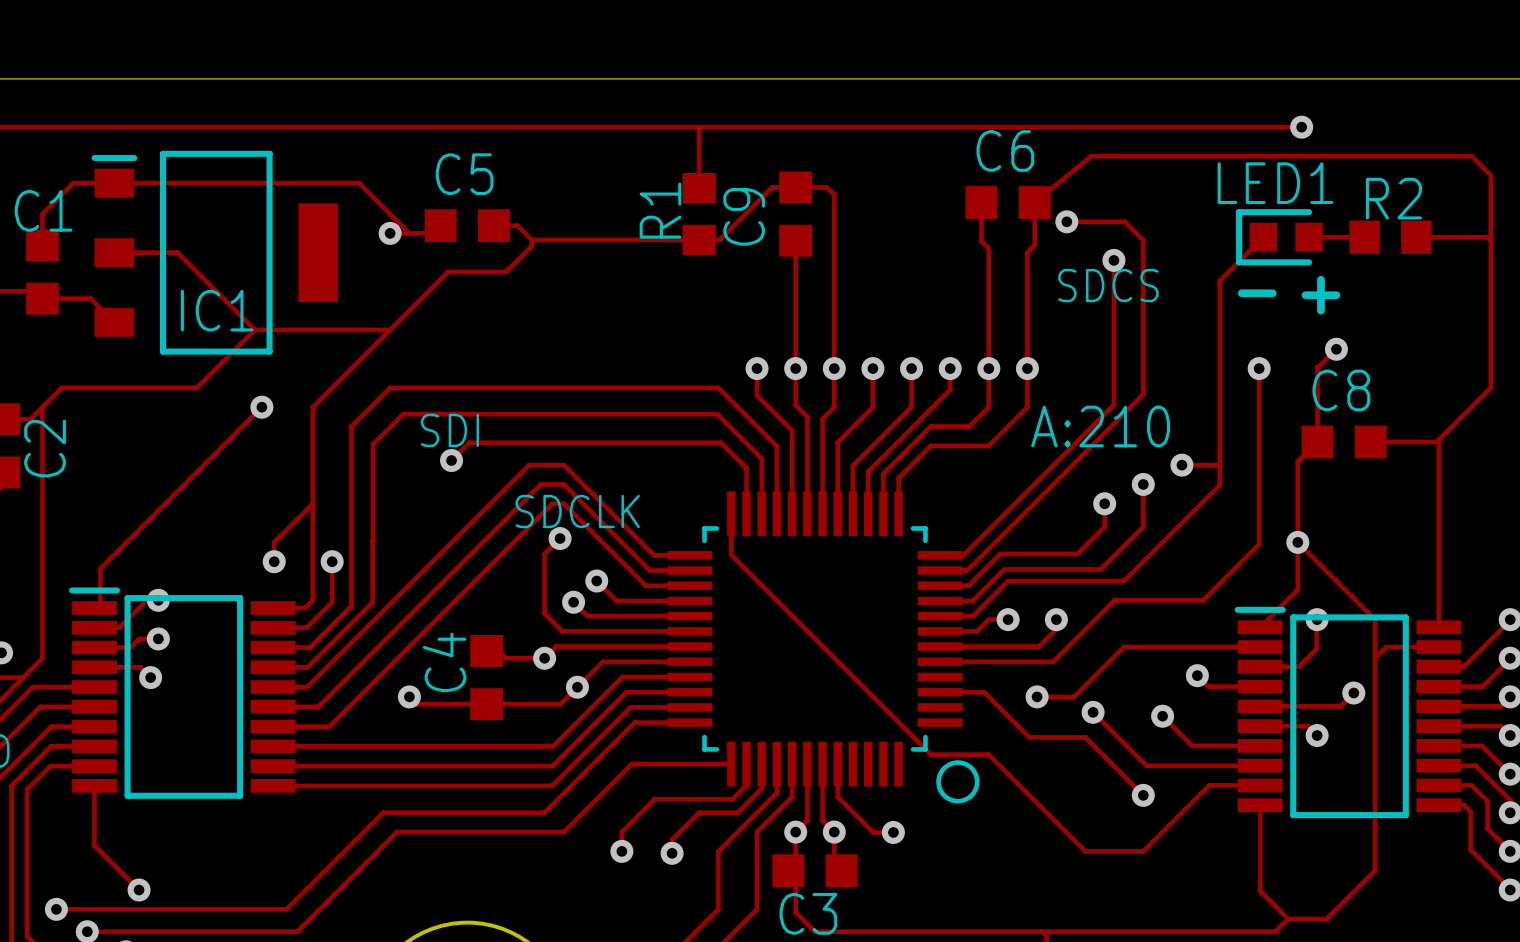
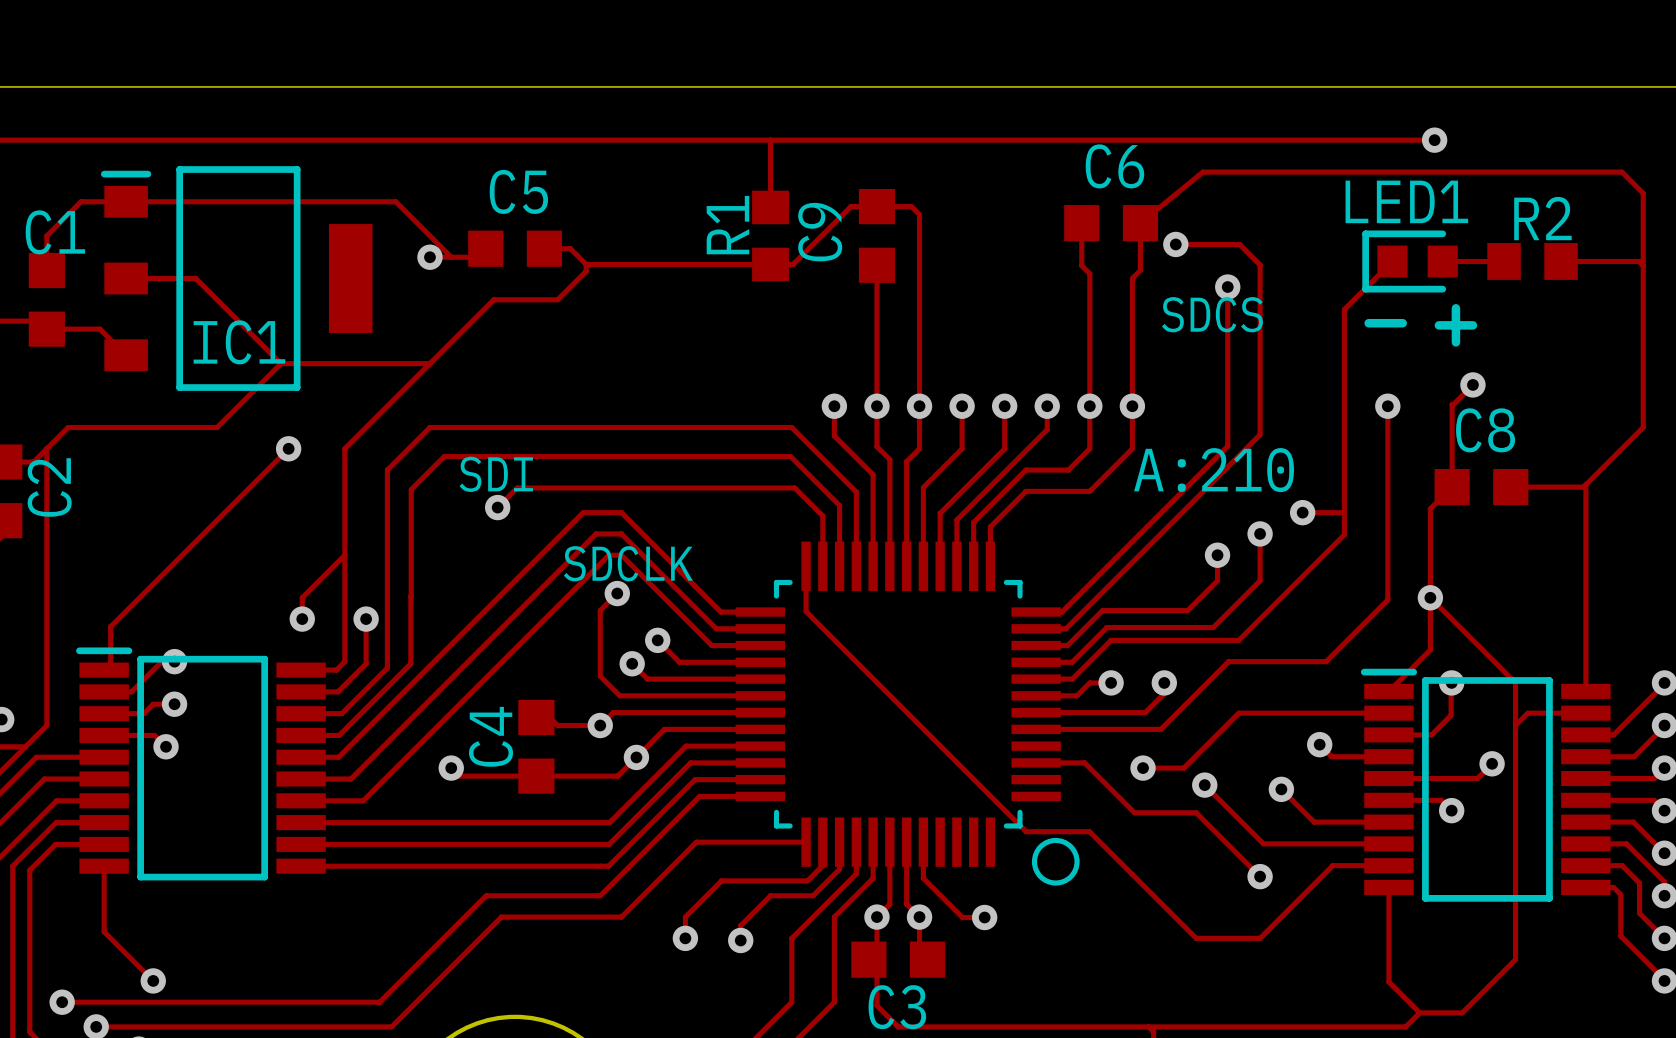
track: (441, 812) (383, 812) (286, 909) -> (486, 895) (379, 1002) (315, 1002)
track: (455, 832) (397, 832) (297, 931) -> (501, 917) (391, 1026) (327, 1026)

